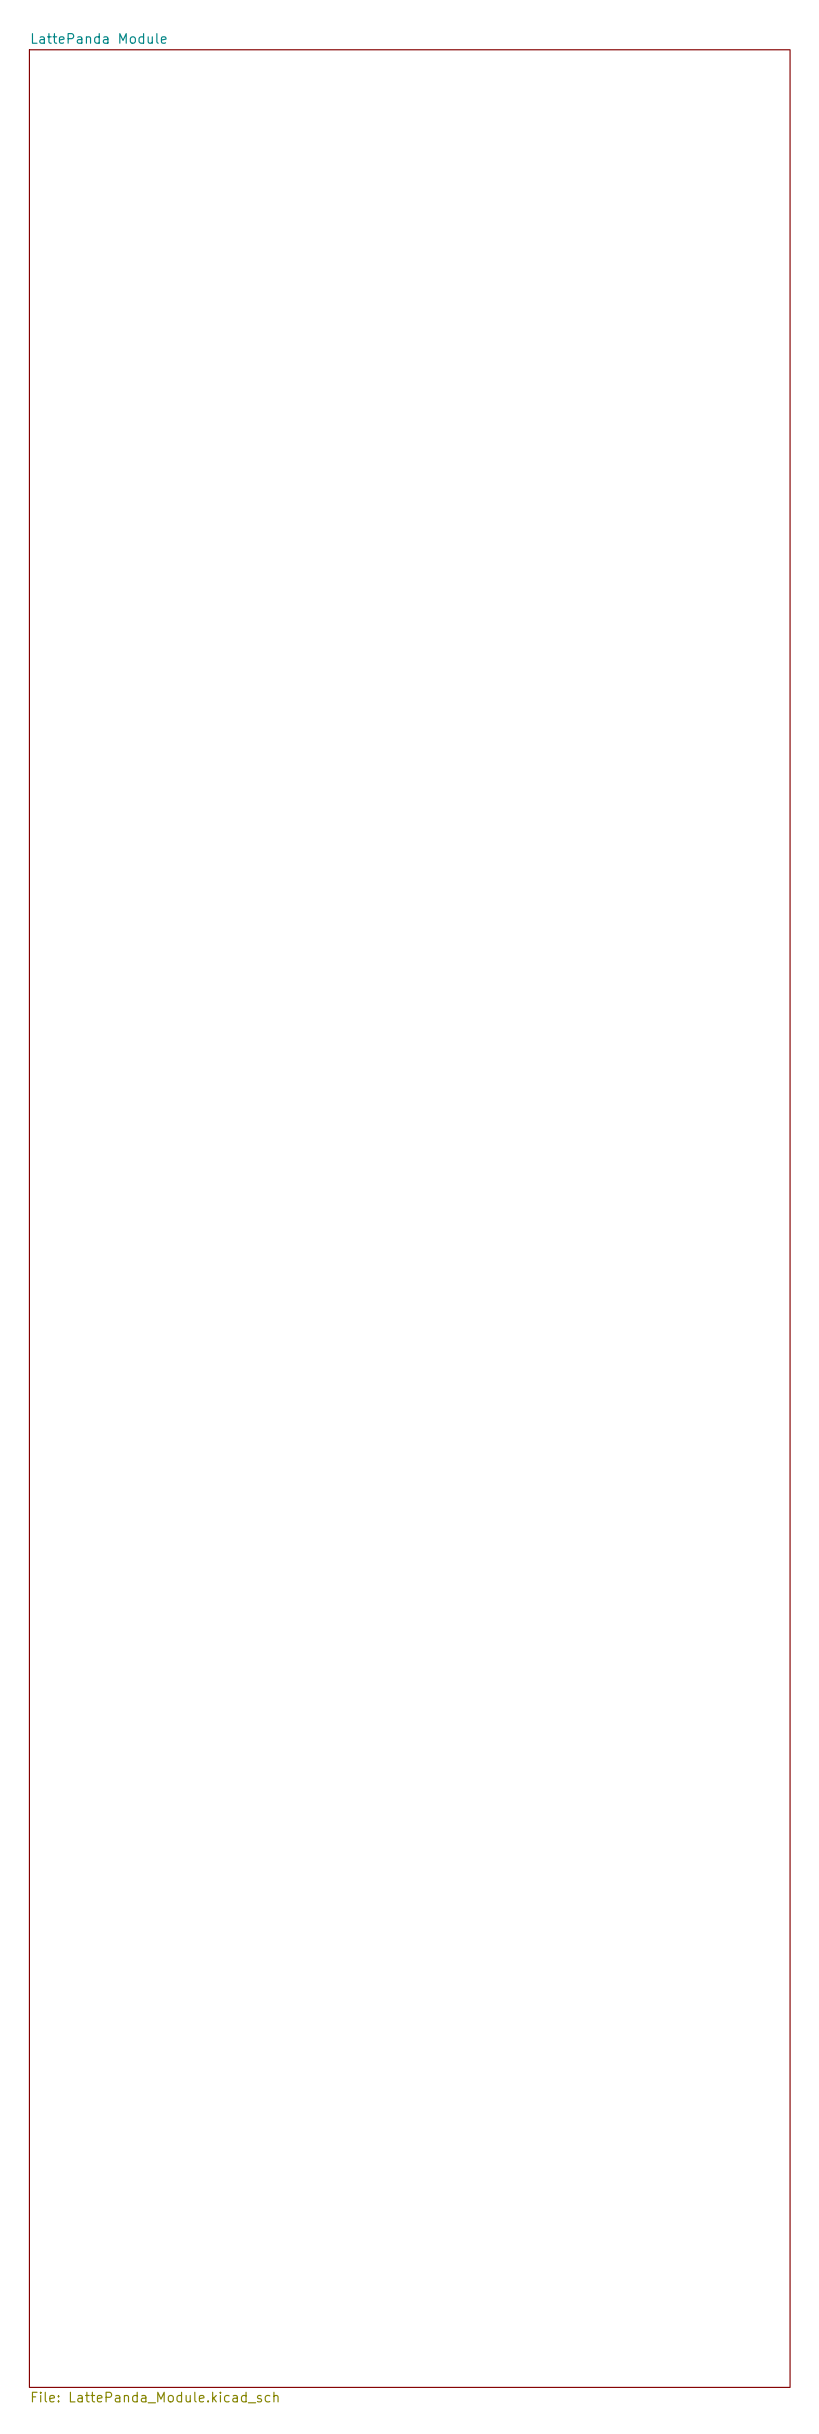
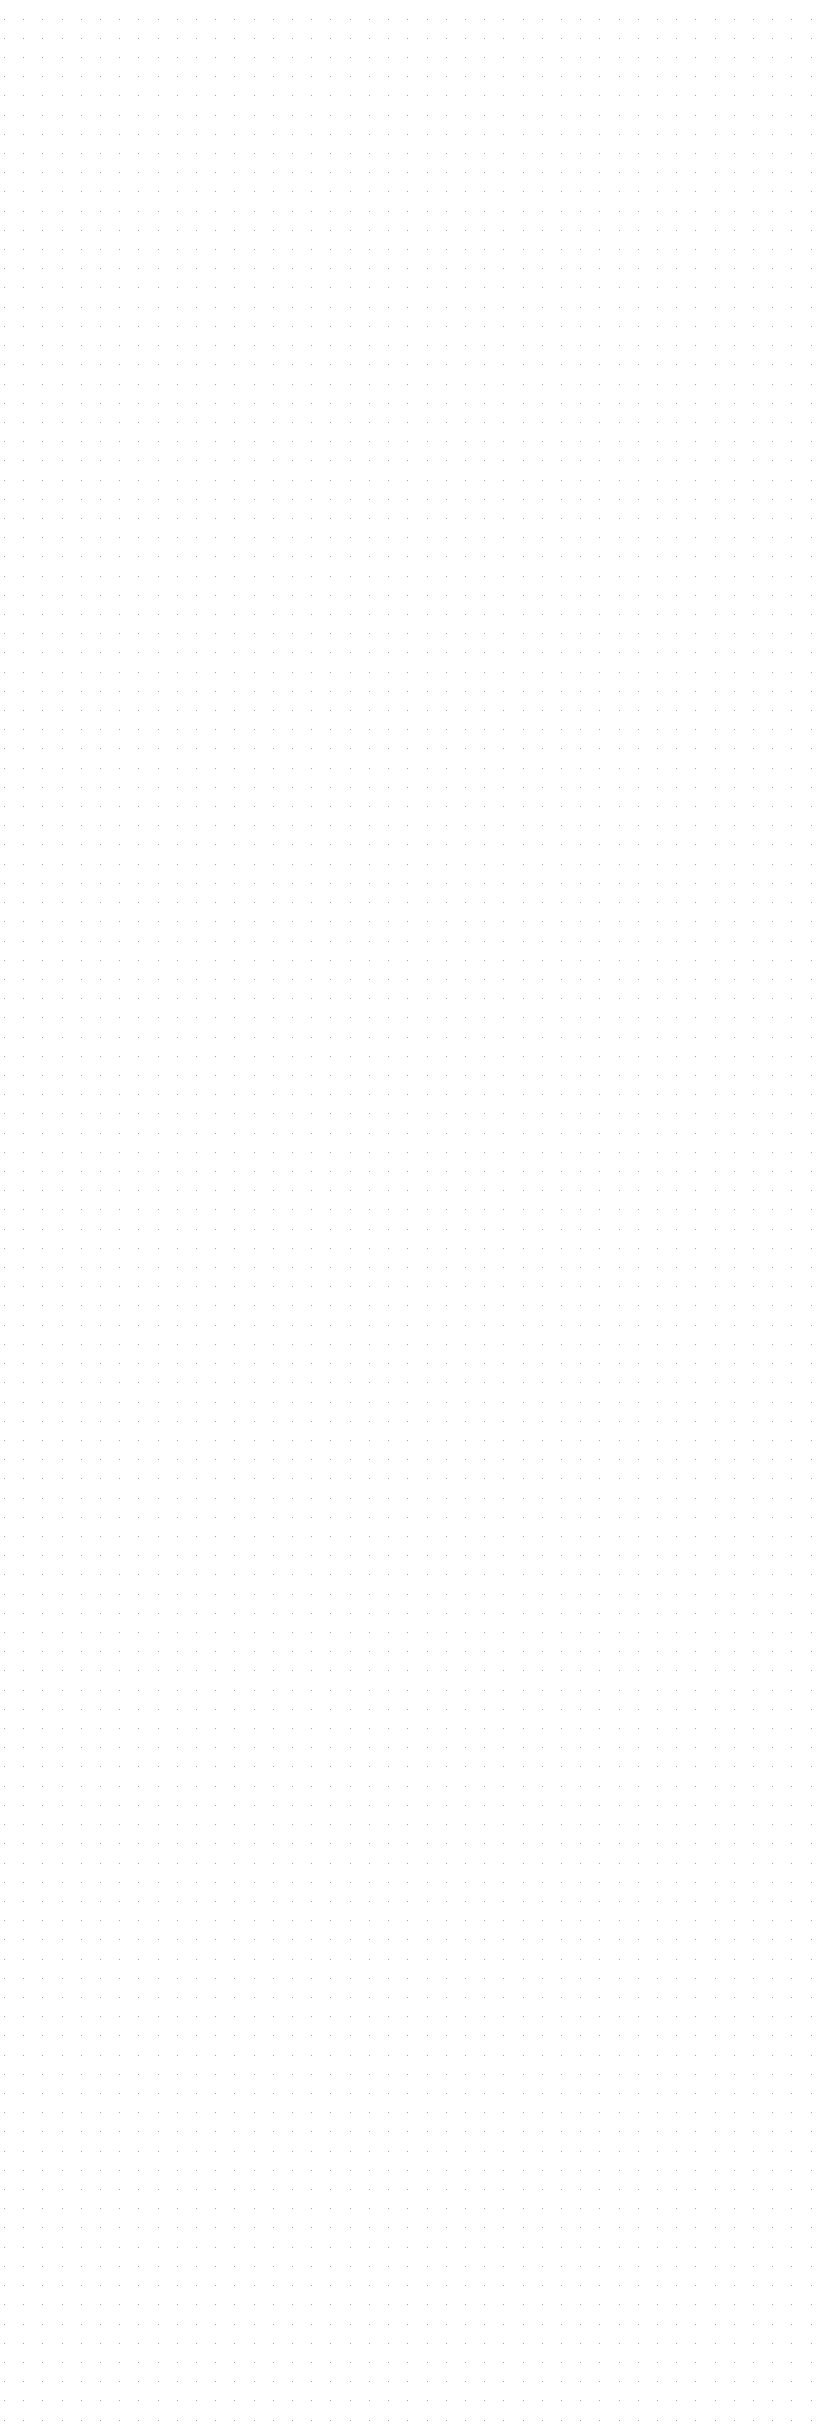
sheet LattePanda Module: File: LattePanda_Module.kicad_sch (409, 1218) -> none

